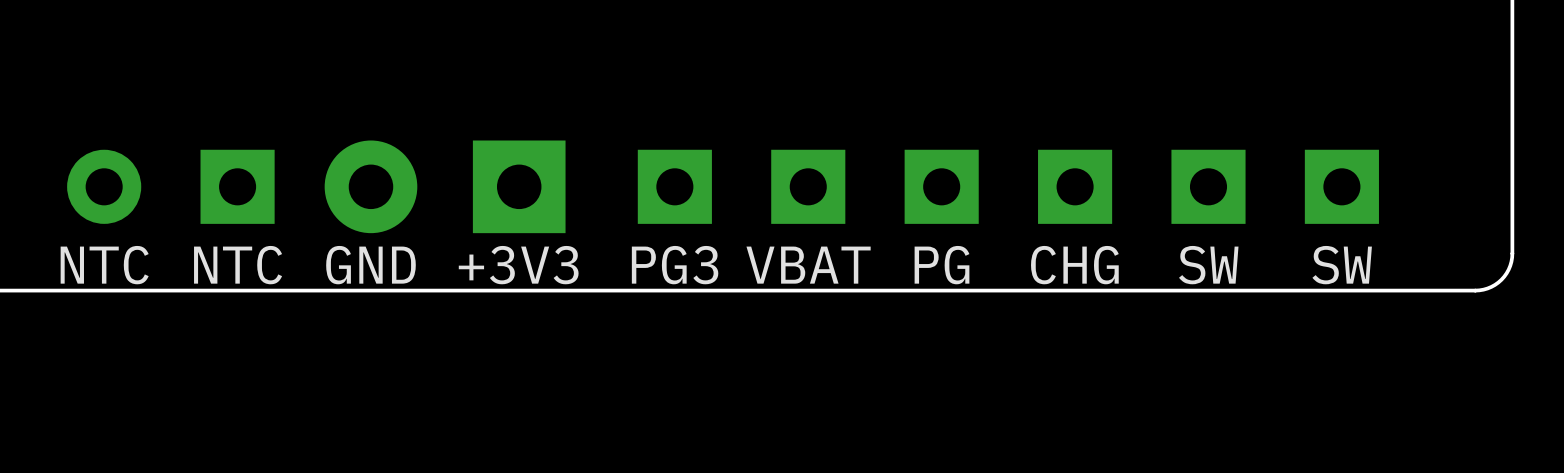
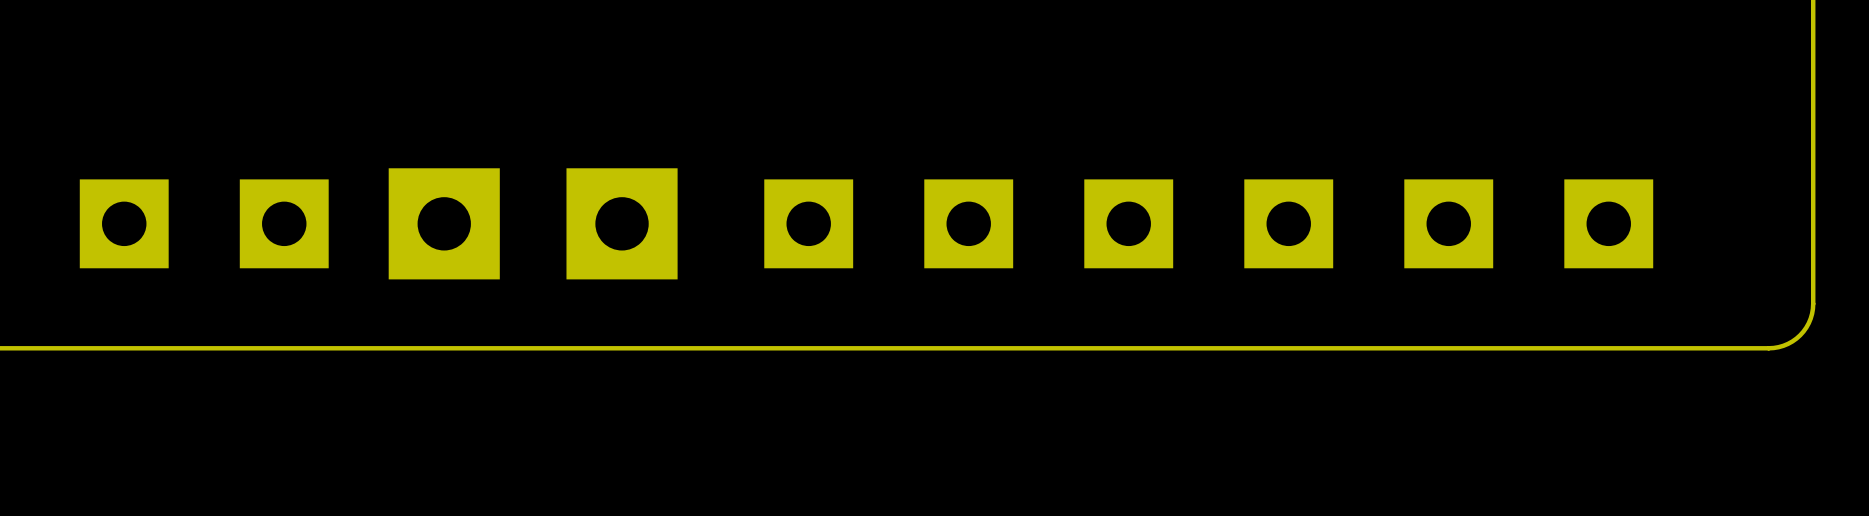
part footprint: [324, 140, 418, 234] -> [388, 168, 500, 280]
part footprint: [67, 149, 142, 224] -> [79, 179, 169, 269]
text: NTC (104, 265) -> none
text: NTC (238, 265) -> none
text: GND (370, 265) -> none
text: +3V3 (518, 265) -> none
text: PG3 (675, 265) -> none
text: VBAT (808, 265) -> none
text: PG (942, 265) -> none
text: CHG (1074, 265) -> none
text: SW (1208, 265) -> none
text: SW (1342, 265) -> none

